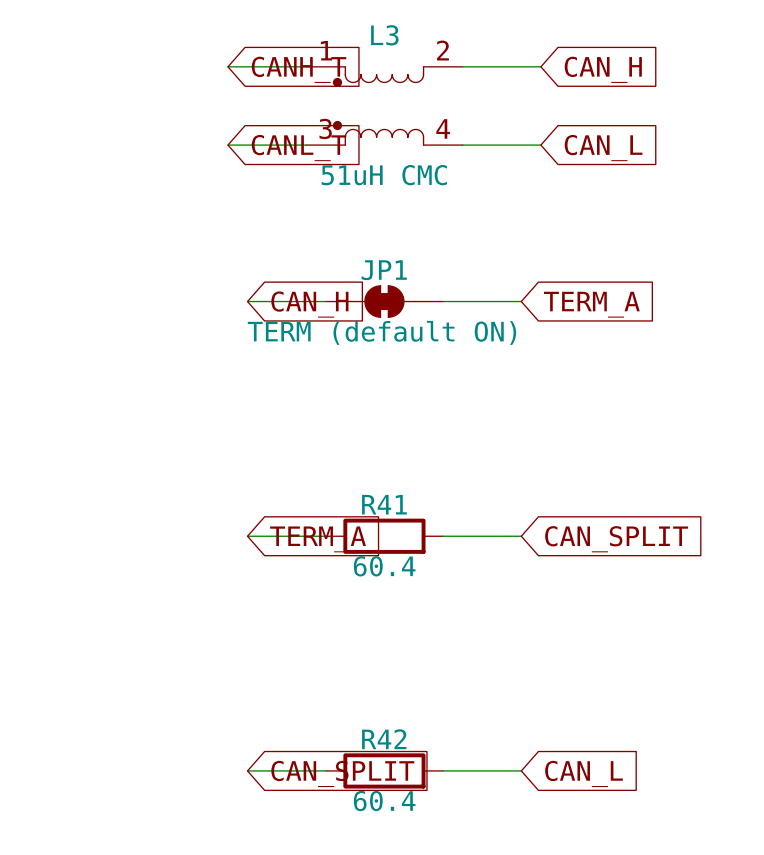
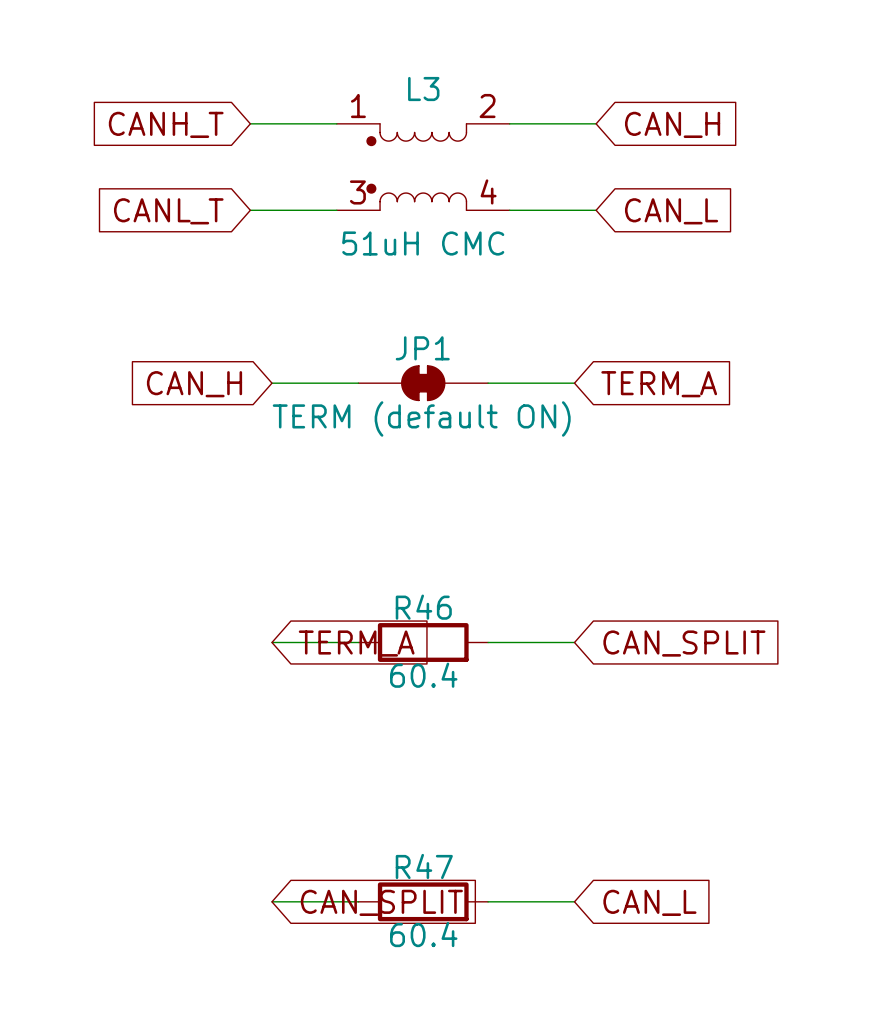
global label rotation: 0° (299, 69) -> 180° (166, 124)
global label position: CANH_T (299, 69) -> CANH_T (166, 124)
global label rotation: 0° (299, 148) -> 180° (168, 211)
global label rotation: 0° (309, 304) -> 180° (194, 384)
R41 name: R41 (384, 504) -> R46 (423, 607)
R42 name: R42 (384, 739) -> R47 (424, 866)

